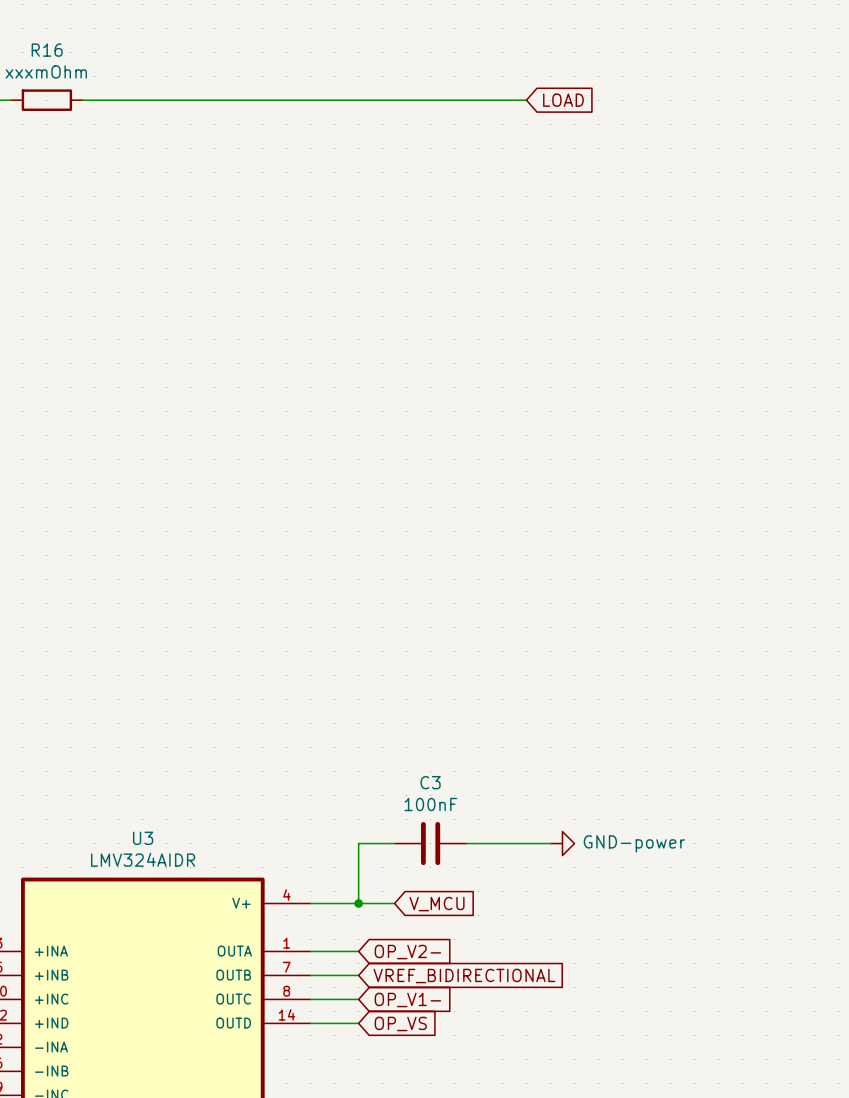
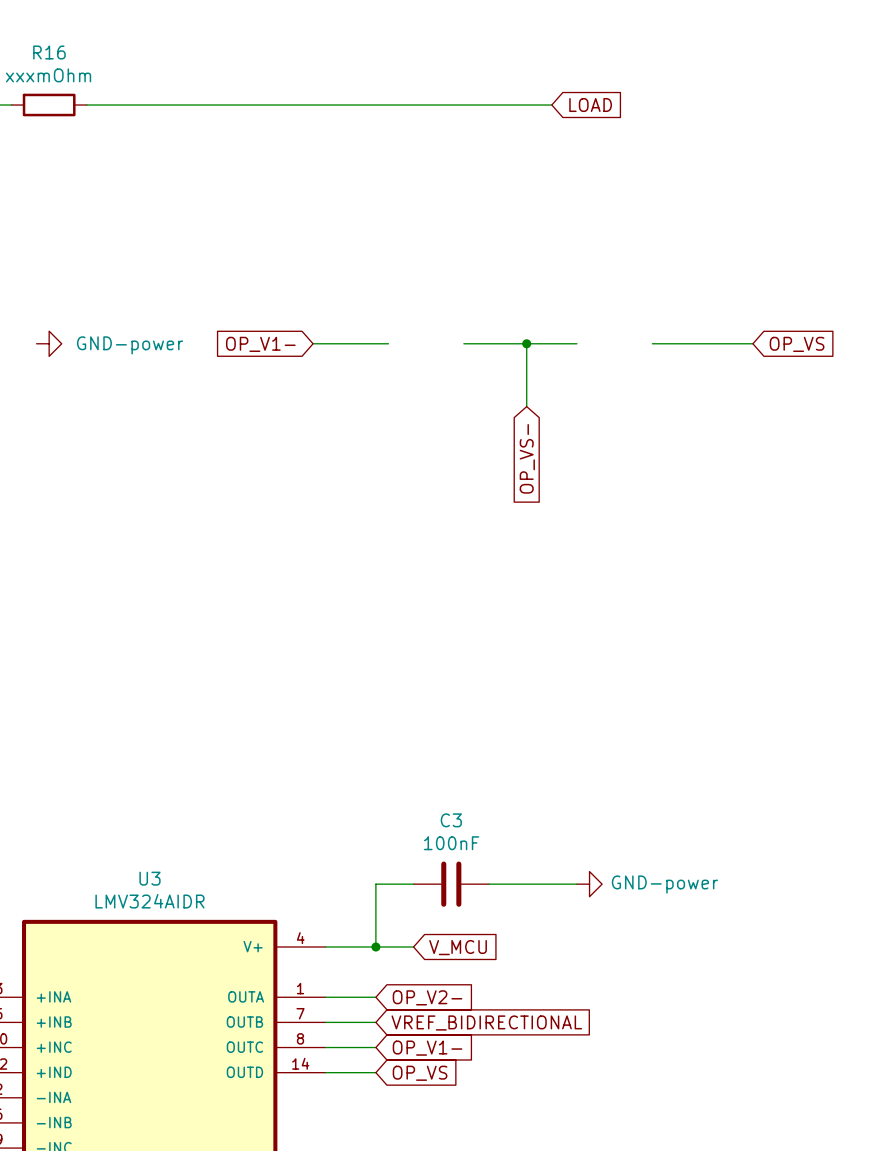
power symbol: none -> GND-power (49, 343)
wire: none -> (313, 343) (388, 343)
wire: none -> (463, 343) (576, 343)
wire: none -> (526, 343) (526, 406)
junction: none -> (526, 343)
wire: none -> (652, 343) (752, 343)
global label: none -> OP_V1- (260, 344)
global label: none -> OP_VS (797, 344)
global label: none -> OP_VS- (527, 458)

